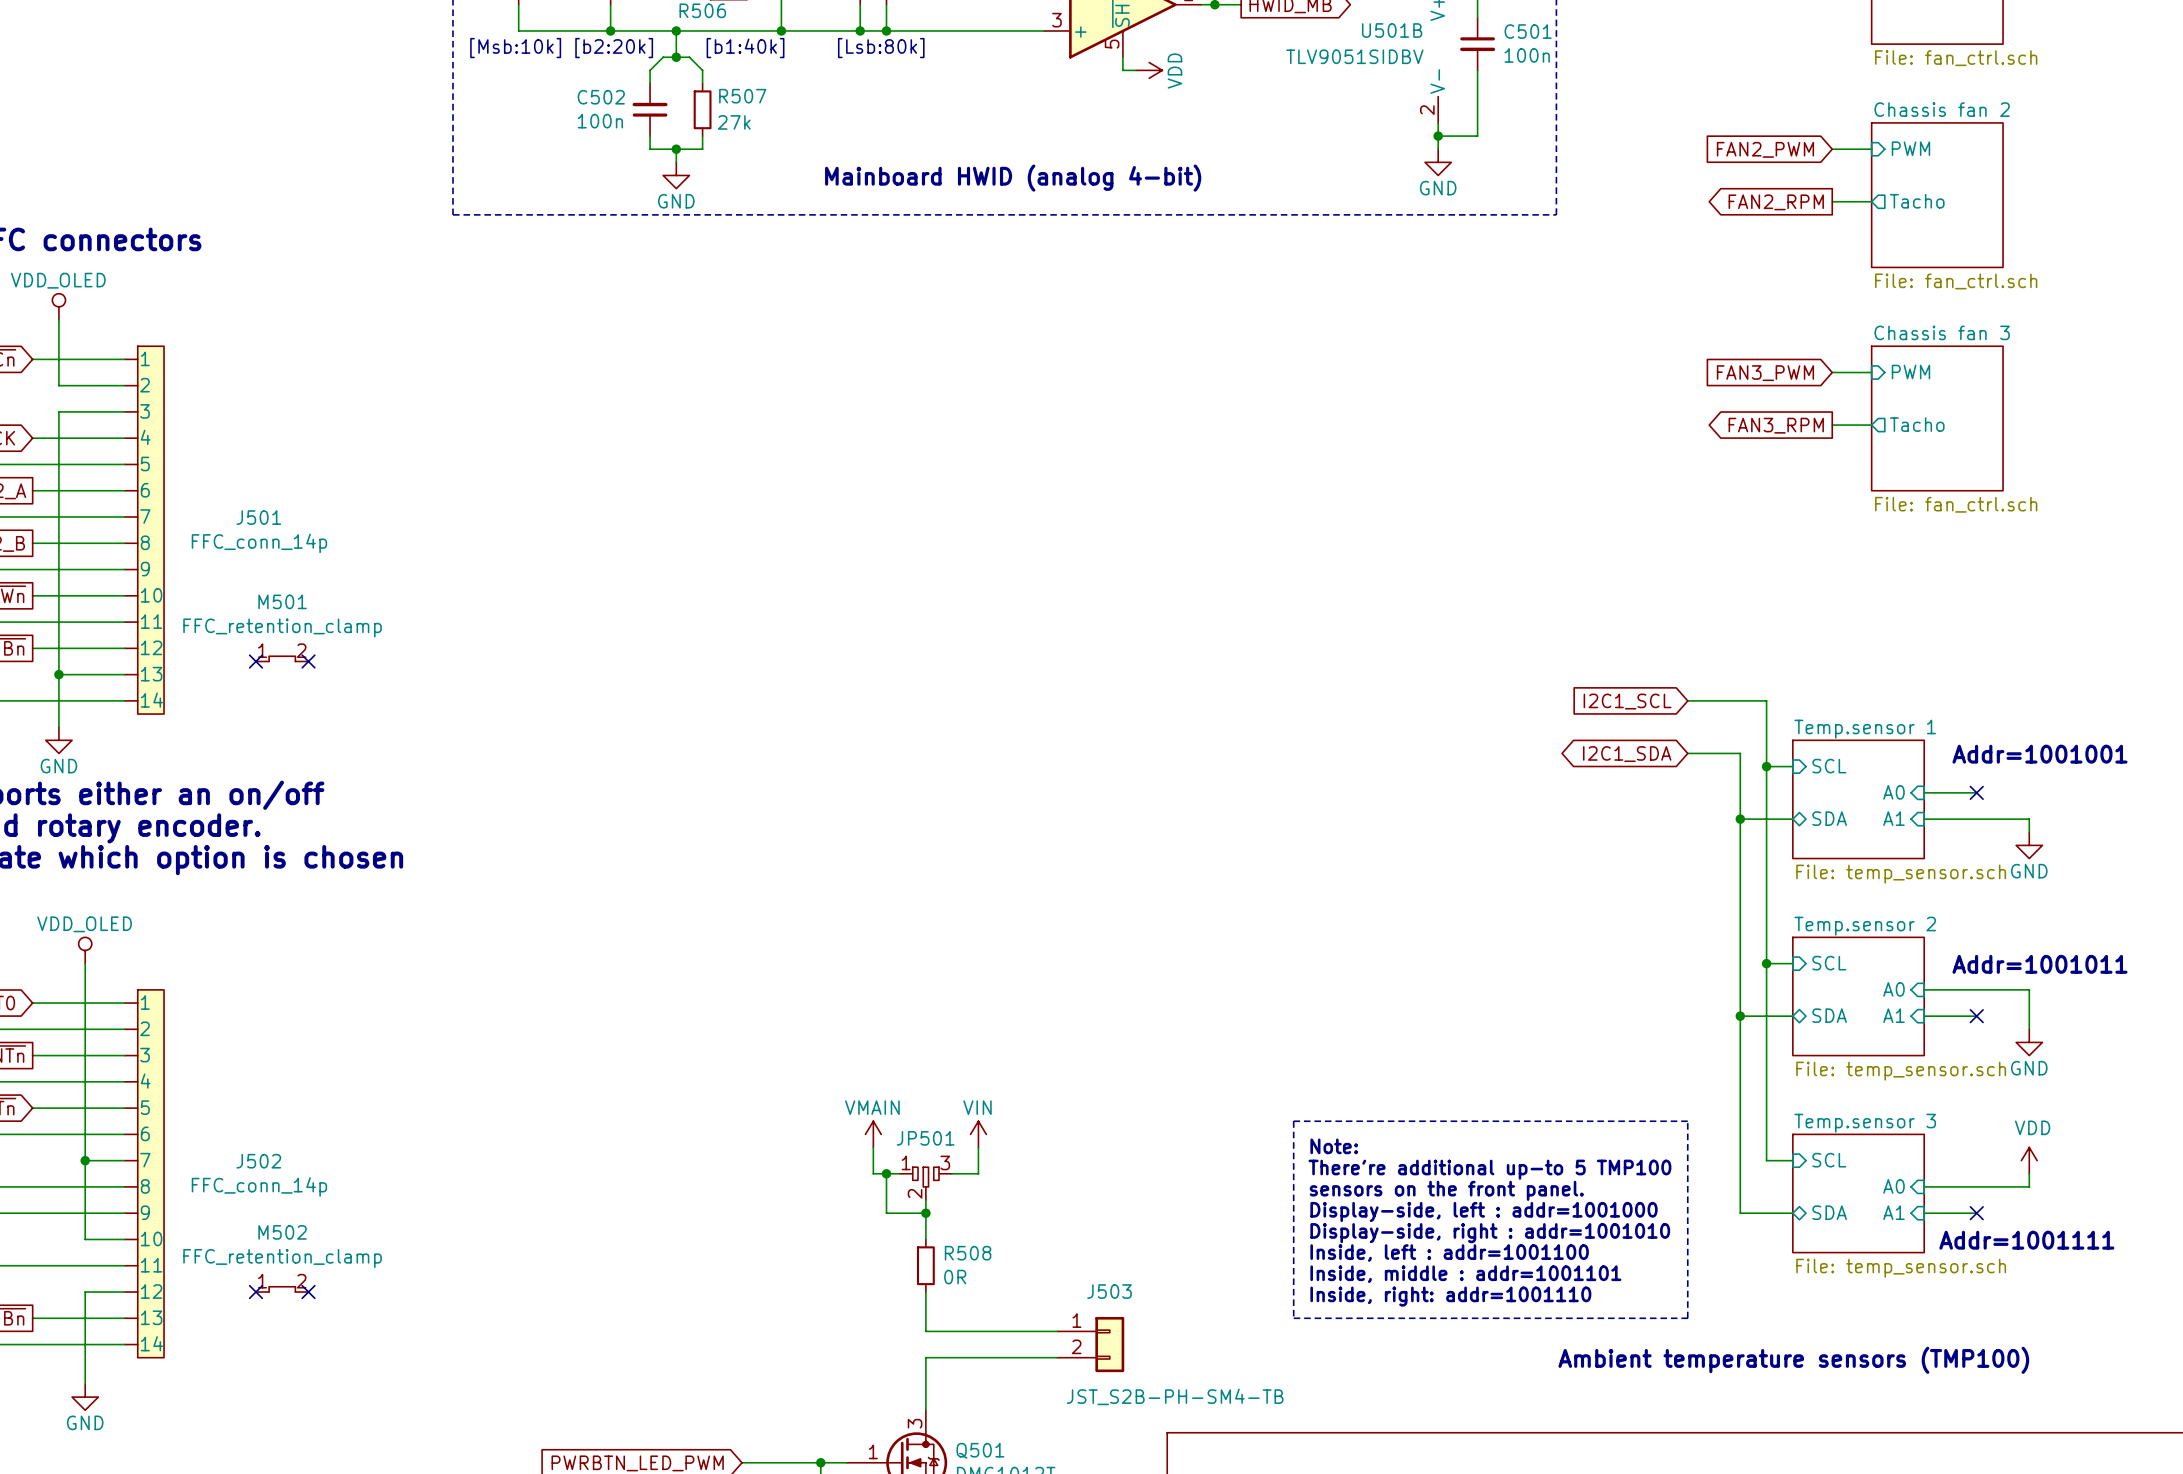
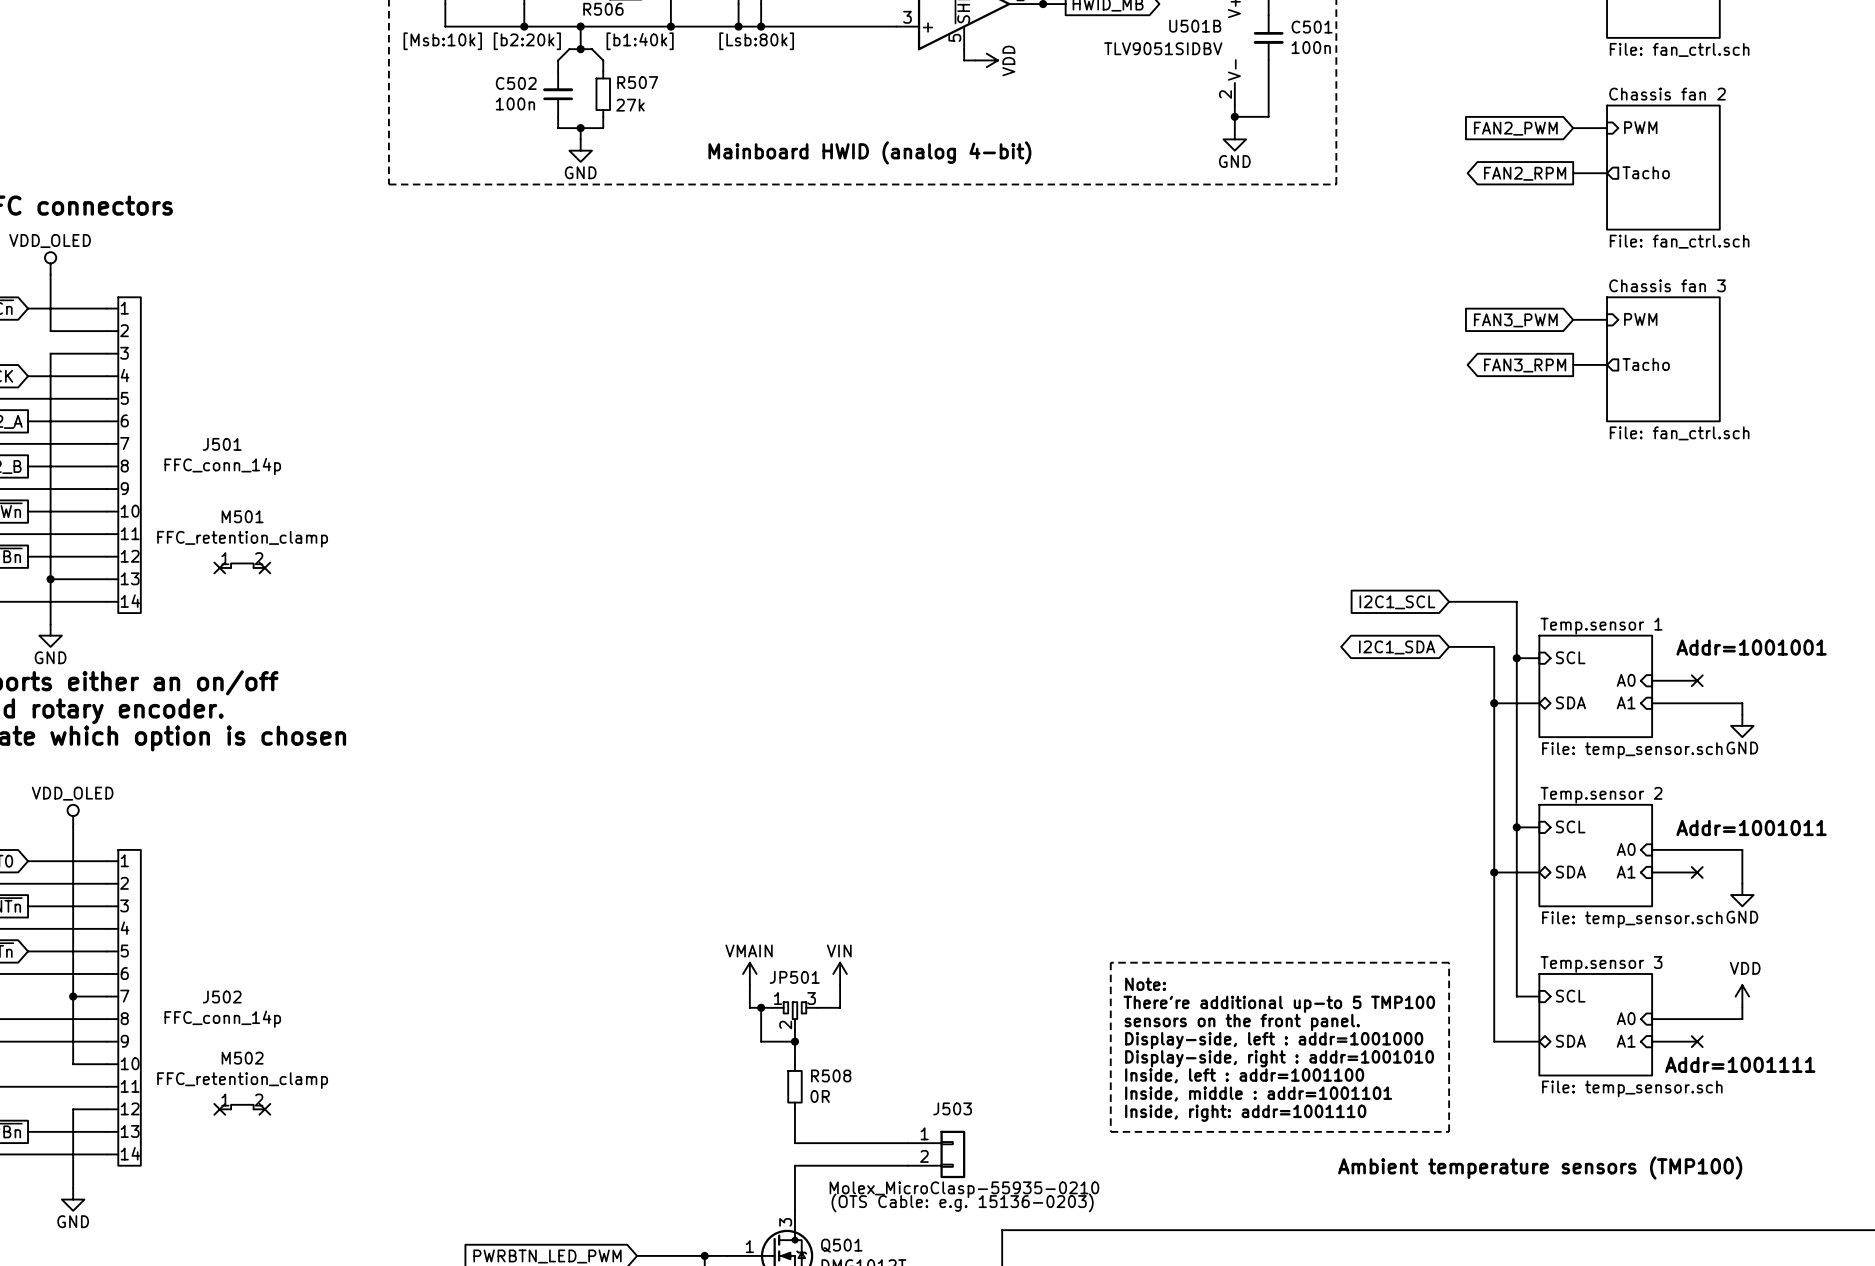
J503 value: JST_S2B-PH-SM4-TB (1175, 1396) -> Molex_MicroClasp-55935-0210 (964, 1189)
text: none -> (OTS Cable: e.g. 15136-0203) (962, 1202)

